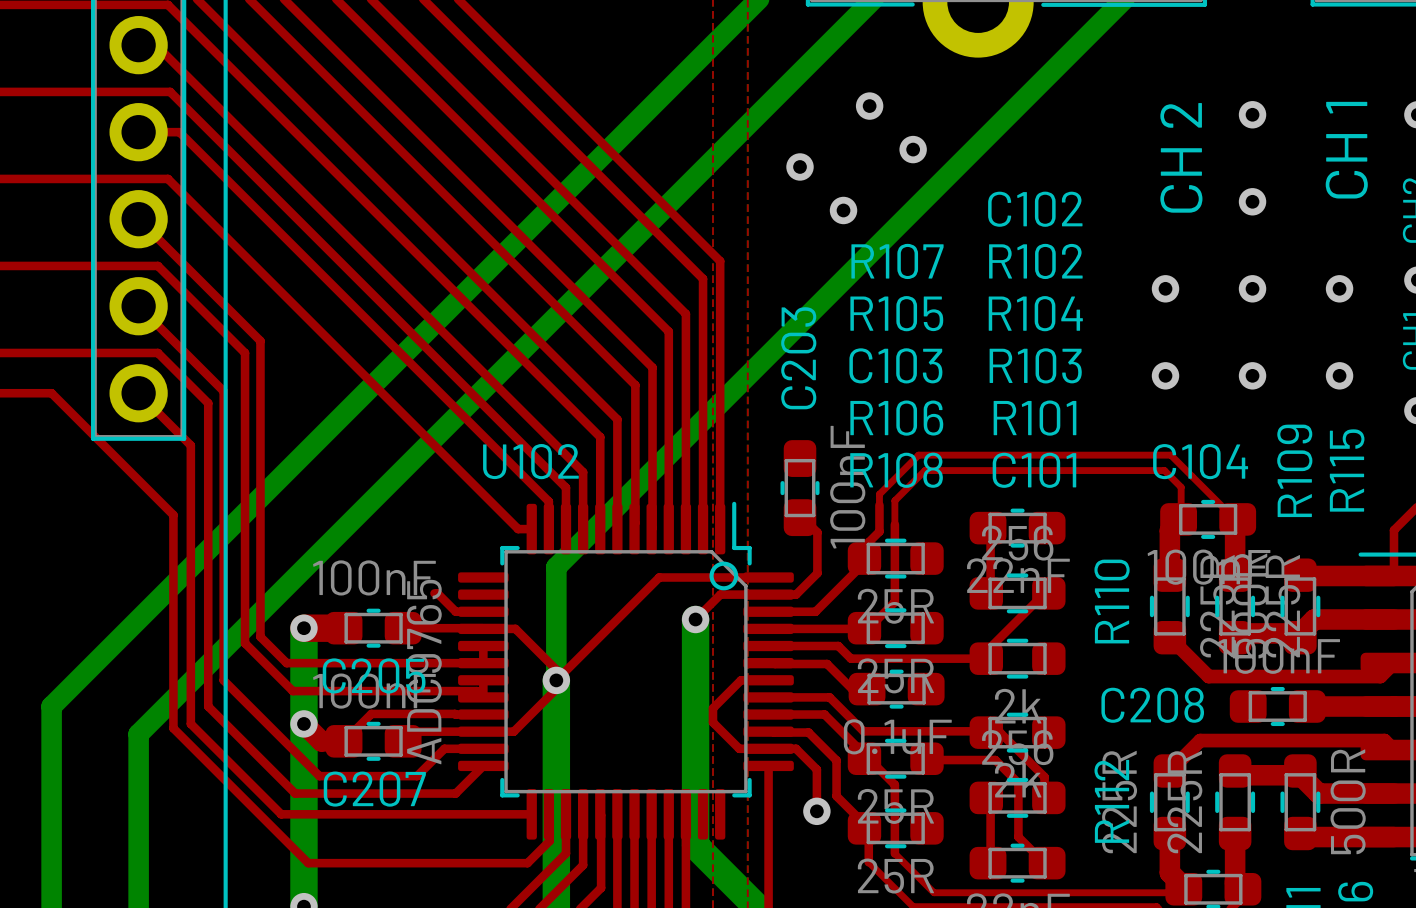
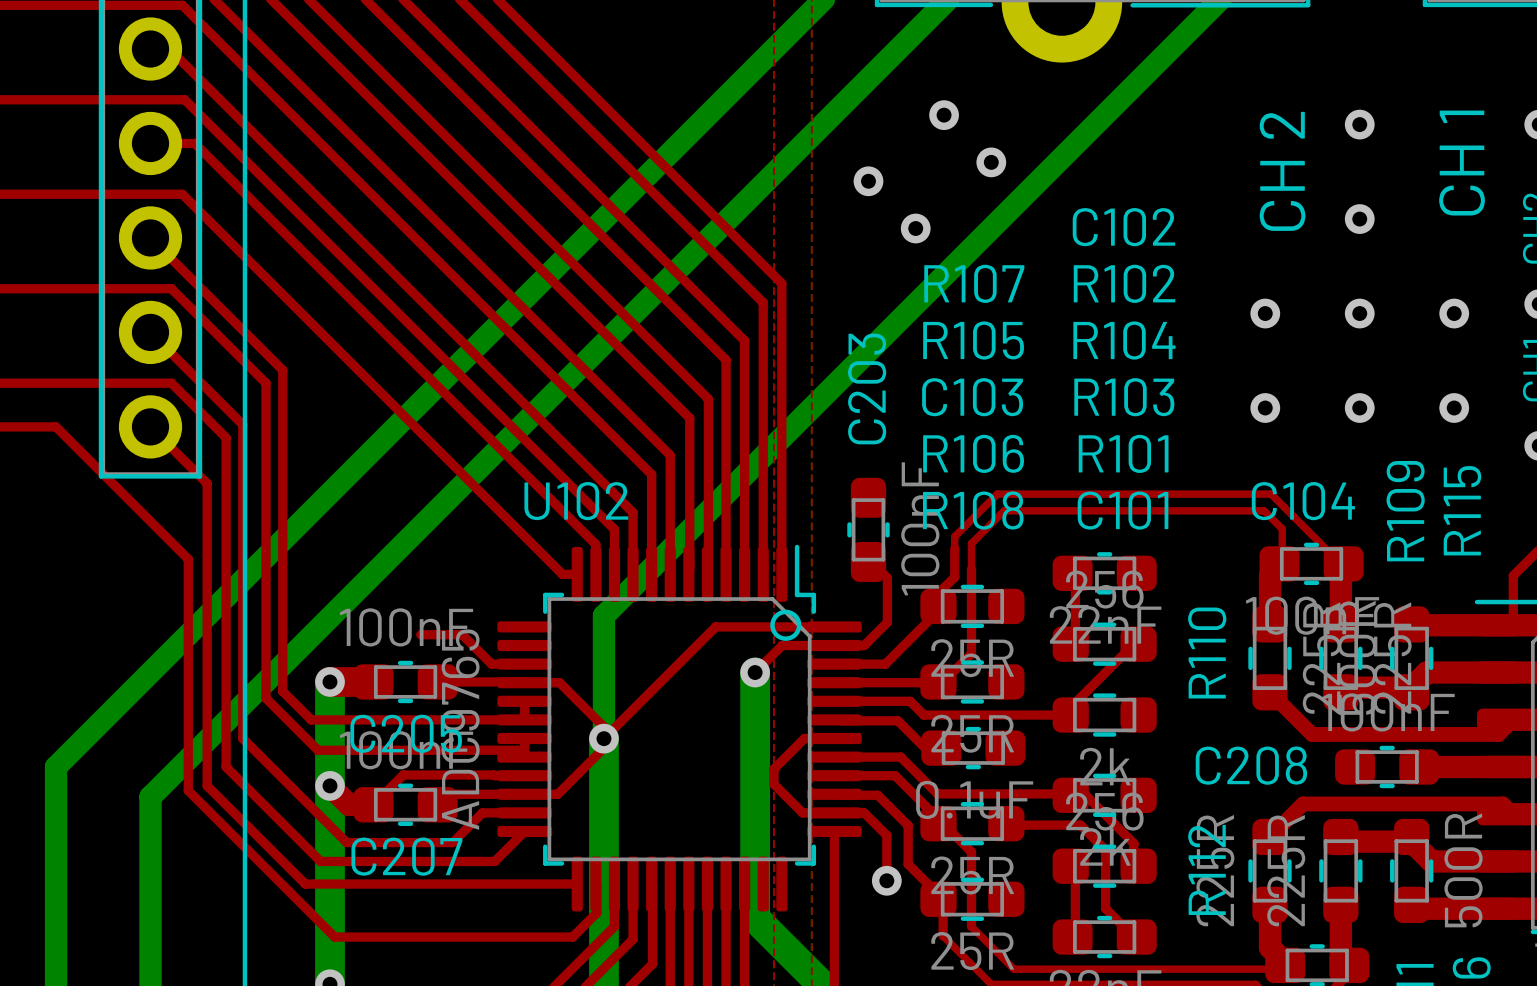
top track: (434, 593) (437, 593) (455, 611) -> (420, 634) (462, 634) (491, 664) (494, 664)

